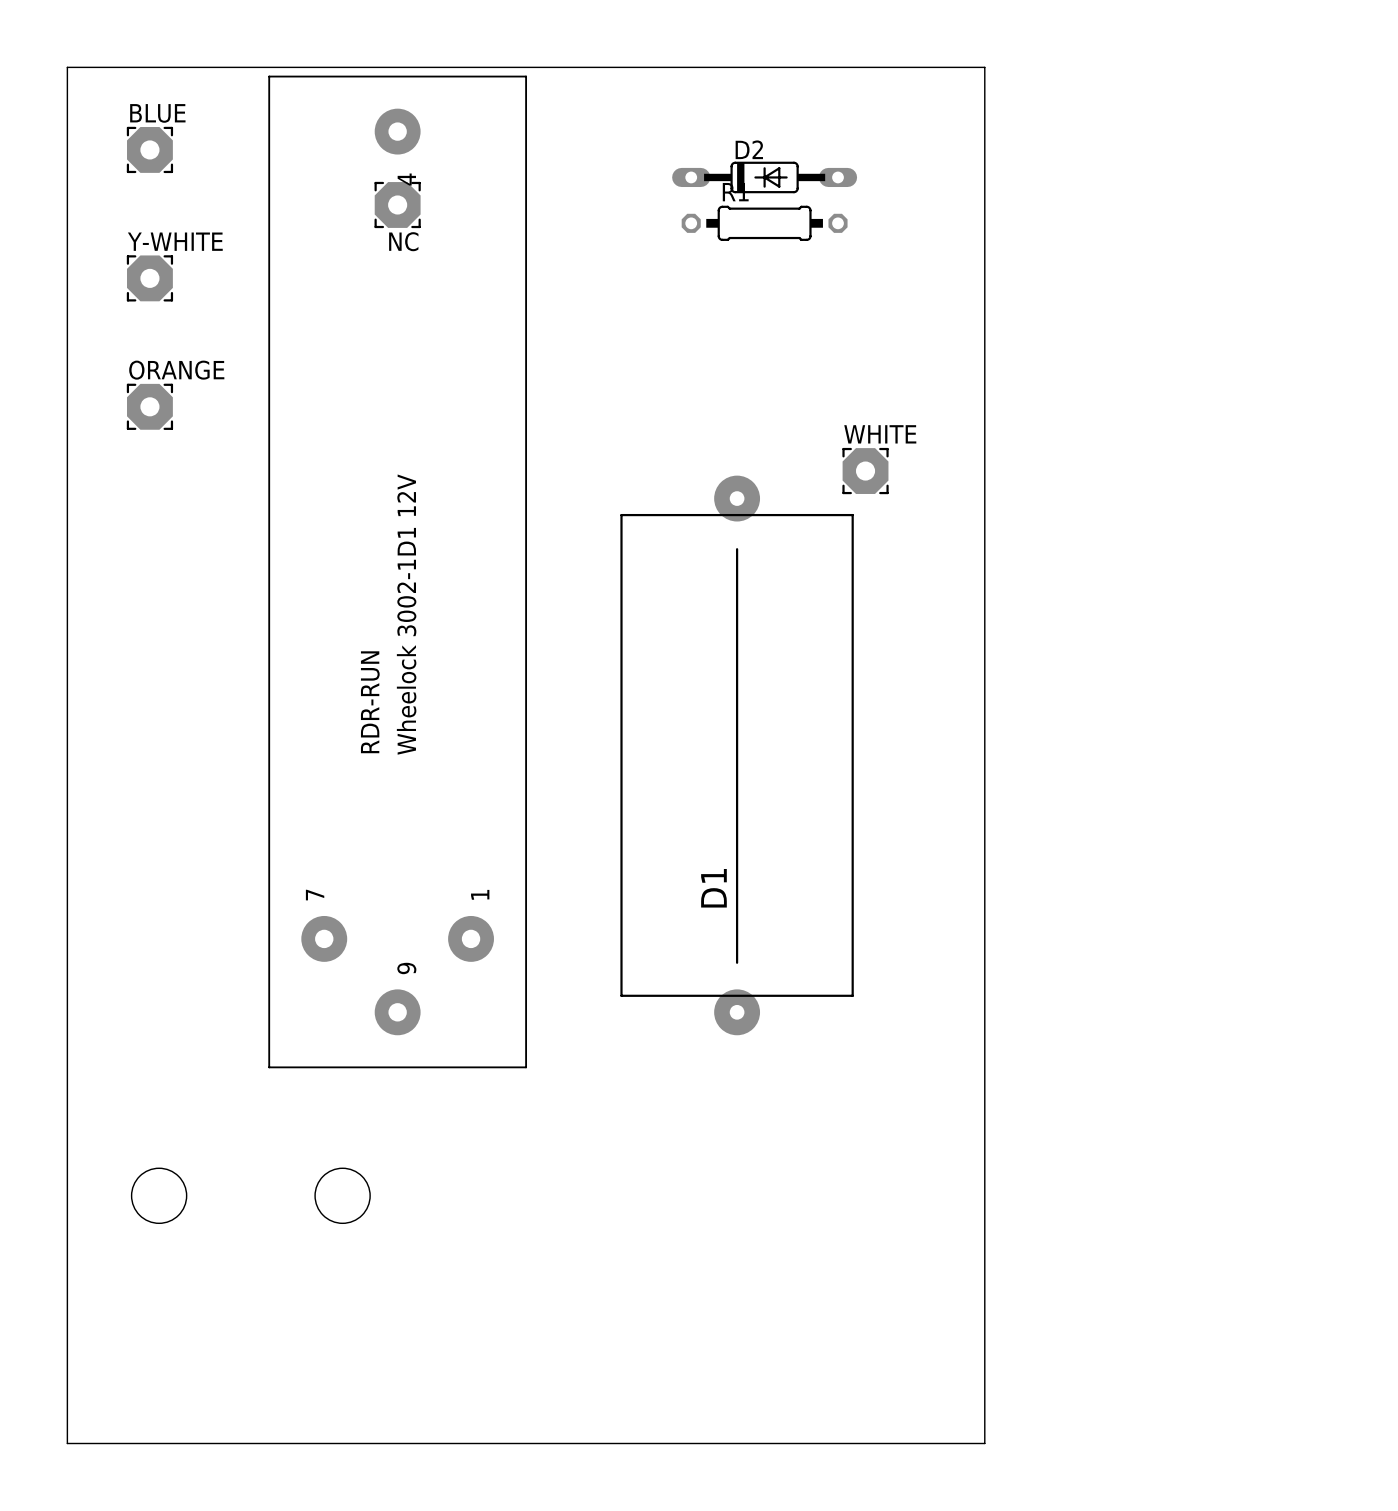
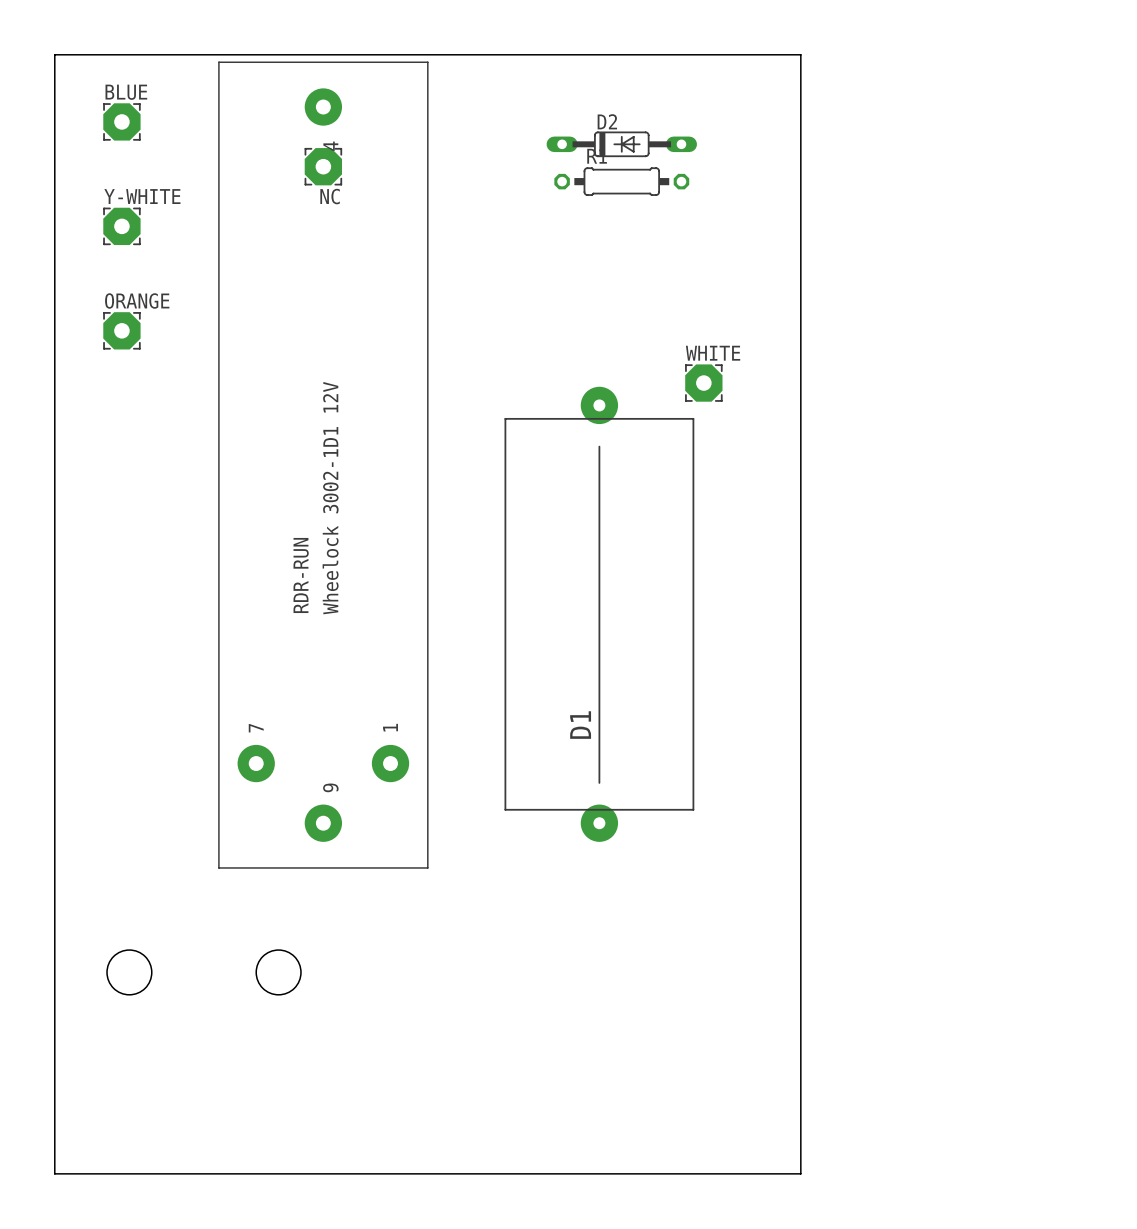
RDR-RUN footprint: [268, 75, 528, 1069] -> [218, 61, 429, 869]

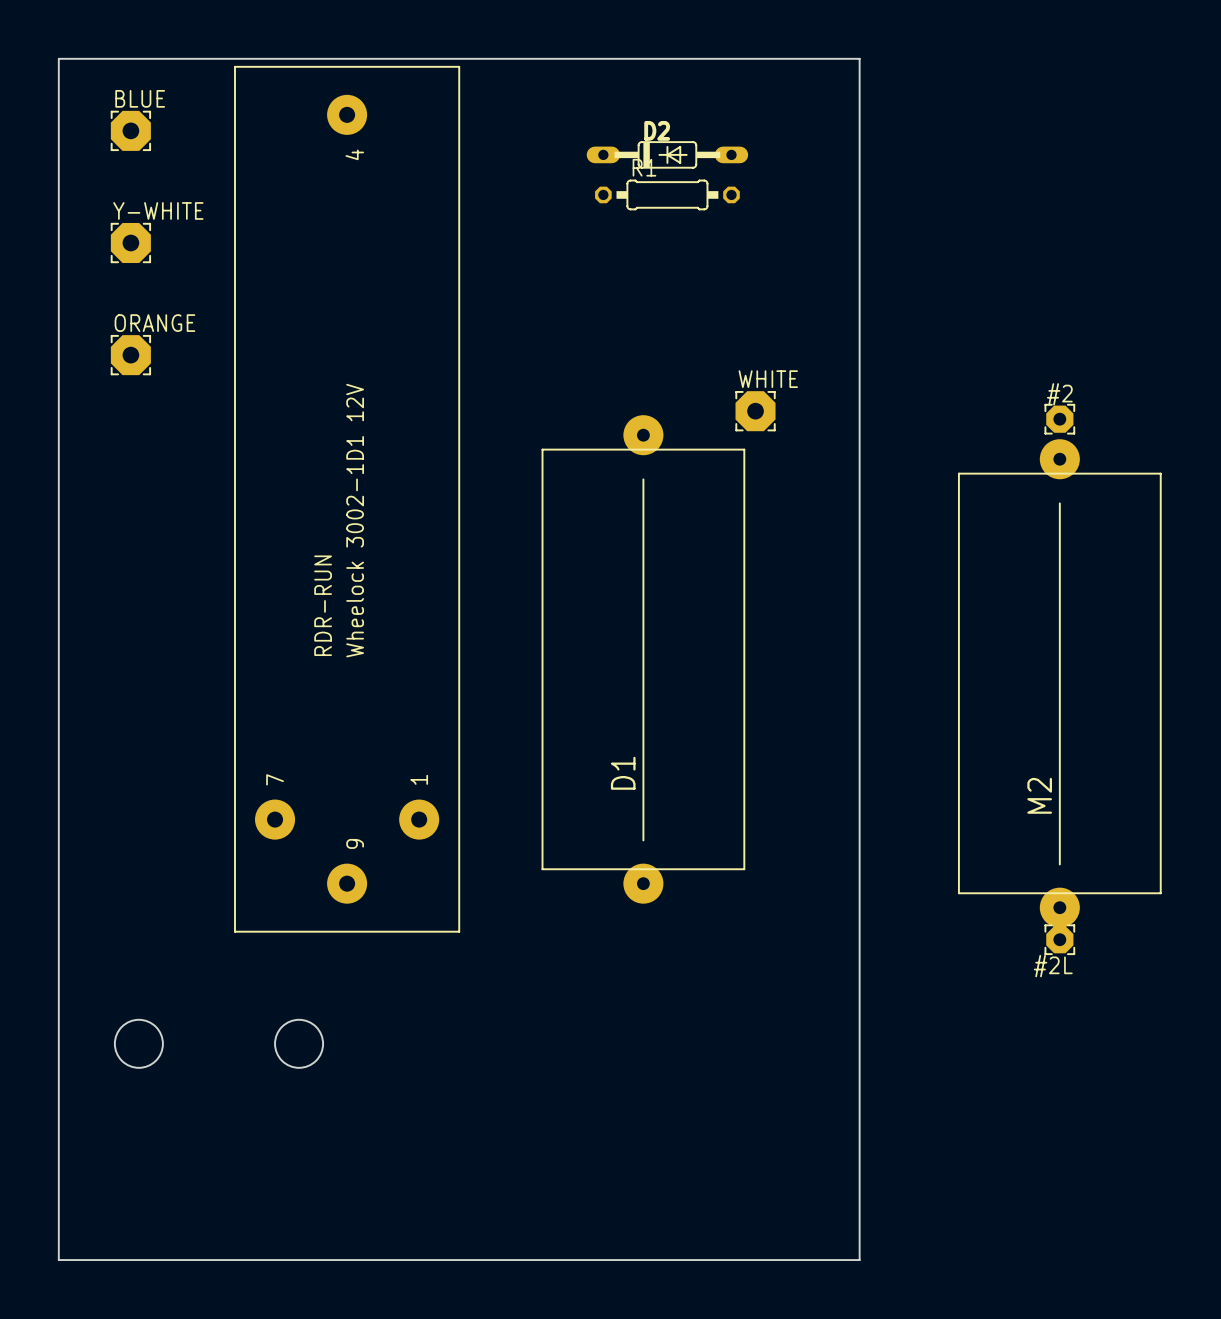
NC: (323, 166) -> none
#2: none -> (1059, 419)
M2: none -> (1059, 683)
#2L: none -> (1059, 939)

